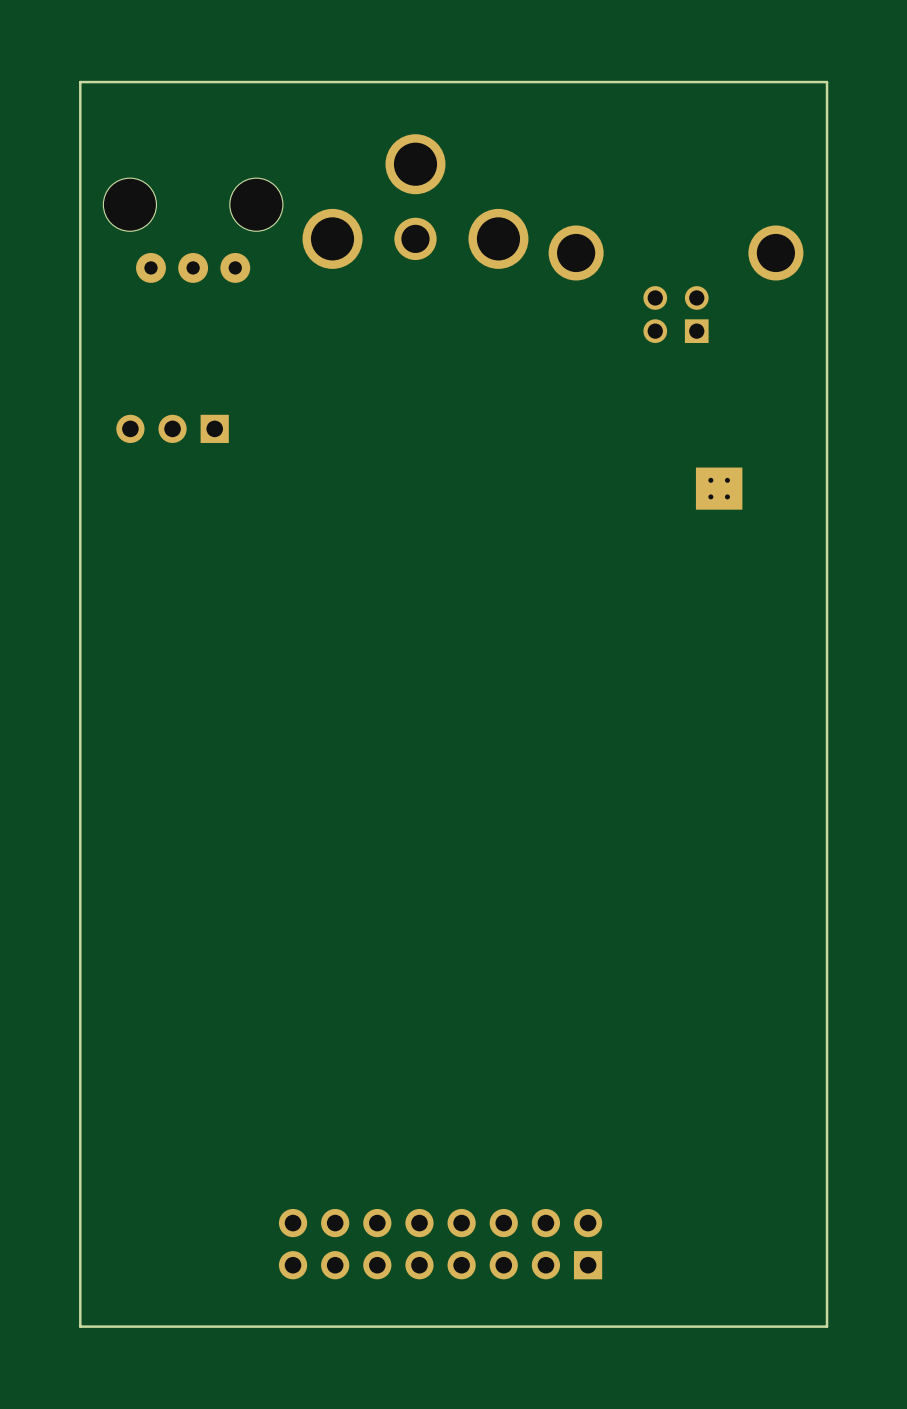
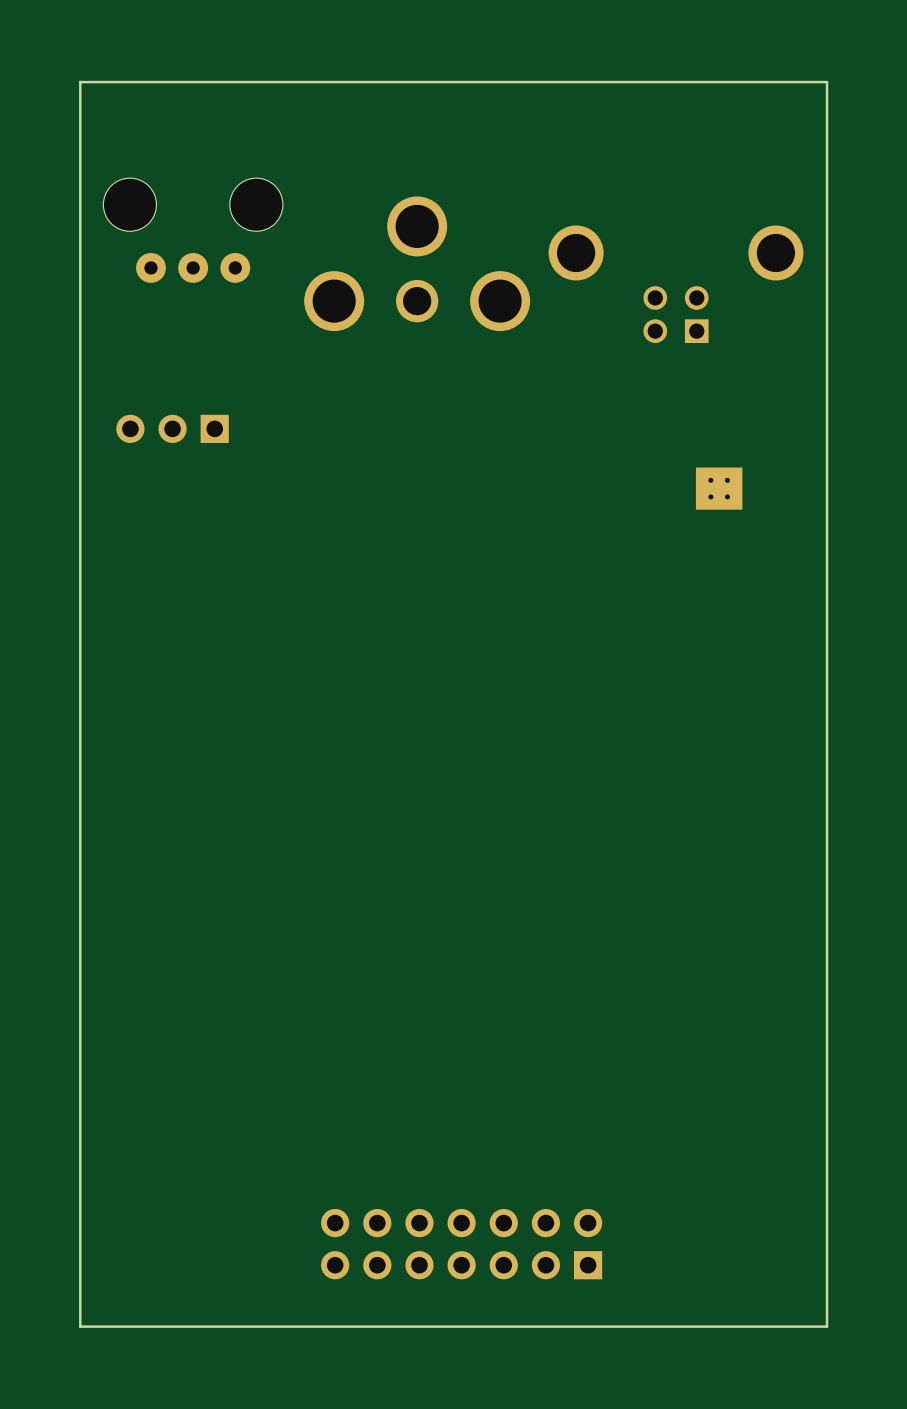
part position: (415, 201) -> (417, 263)
part: (440, 1244) -> none

